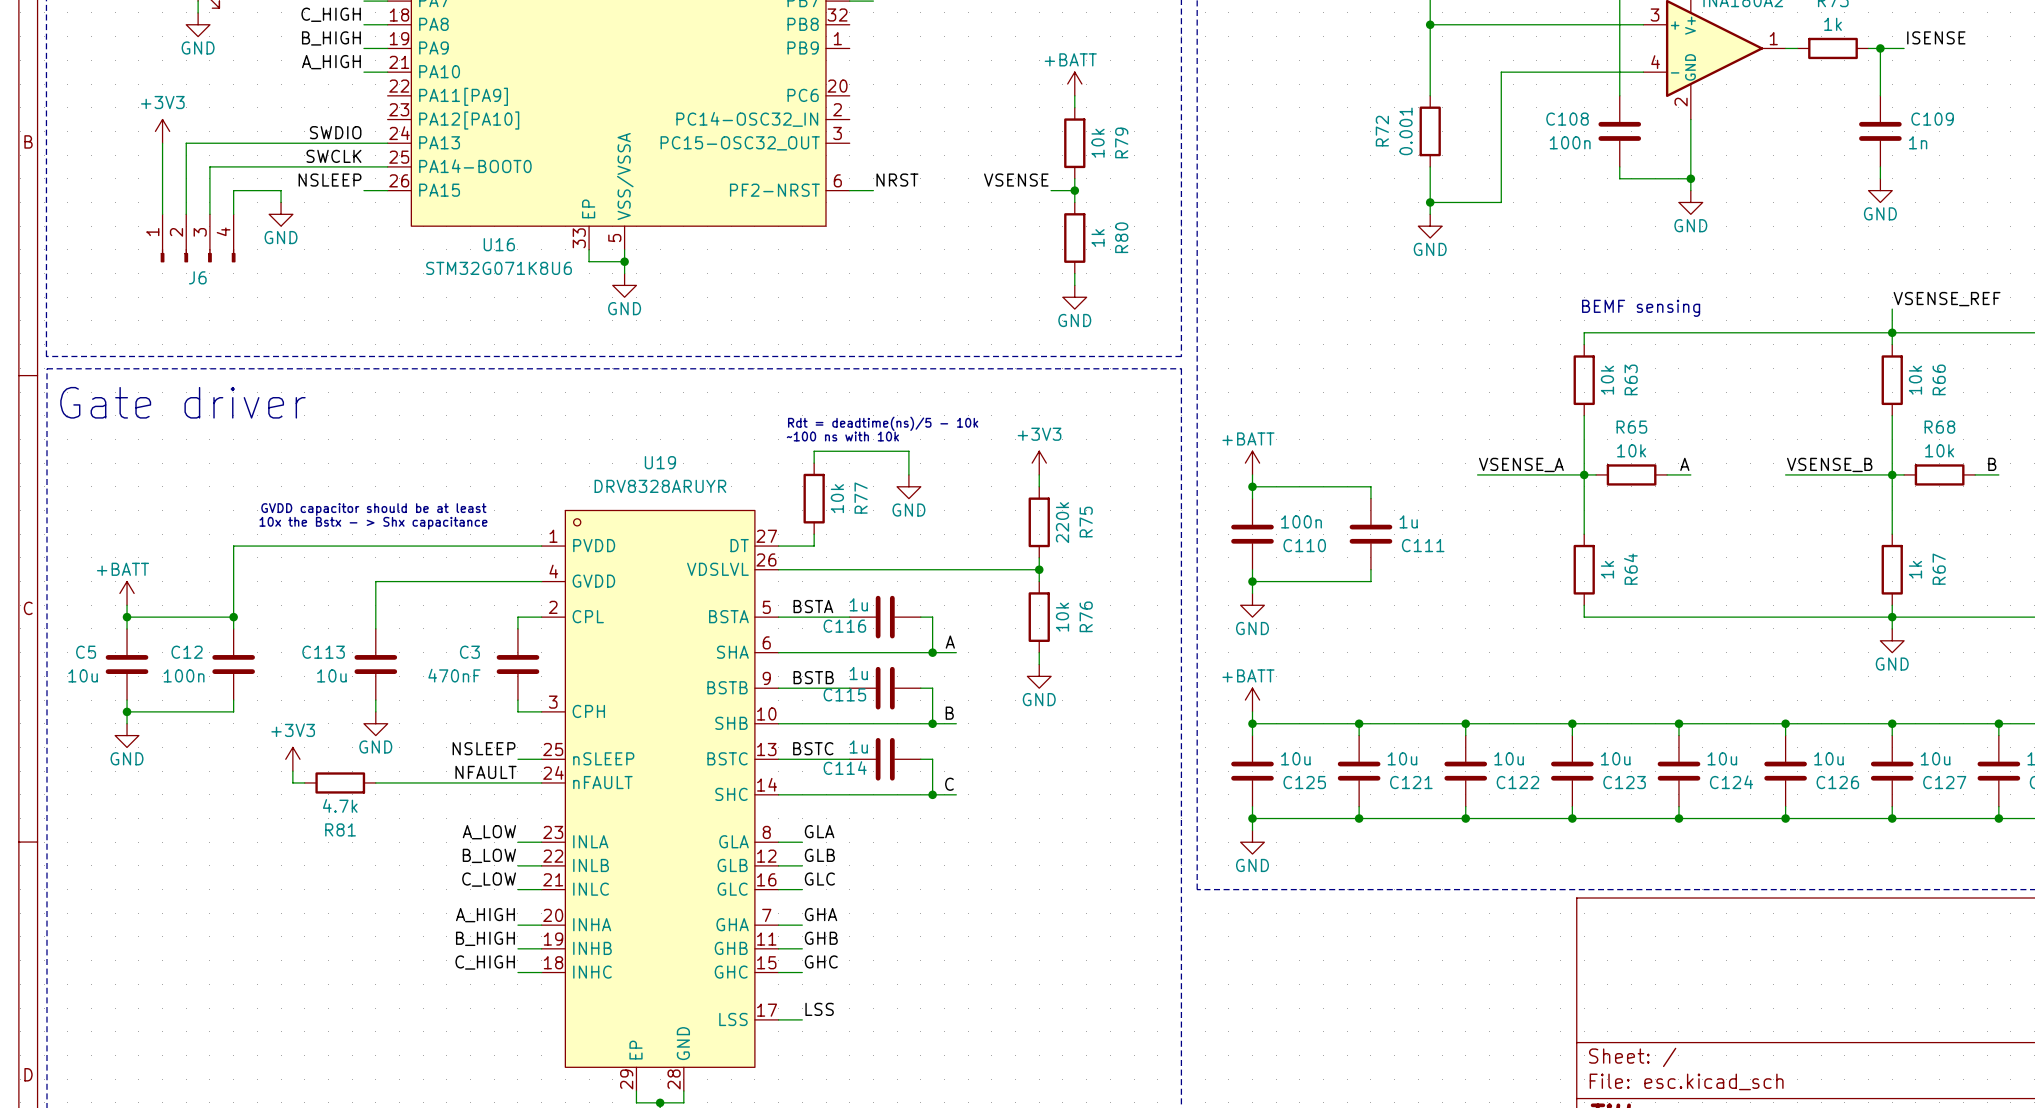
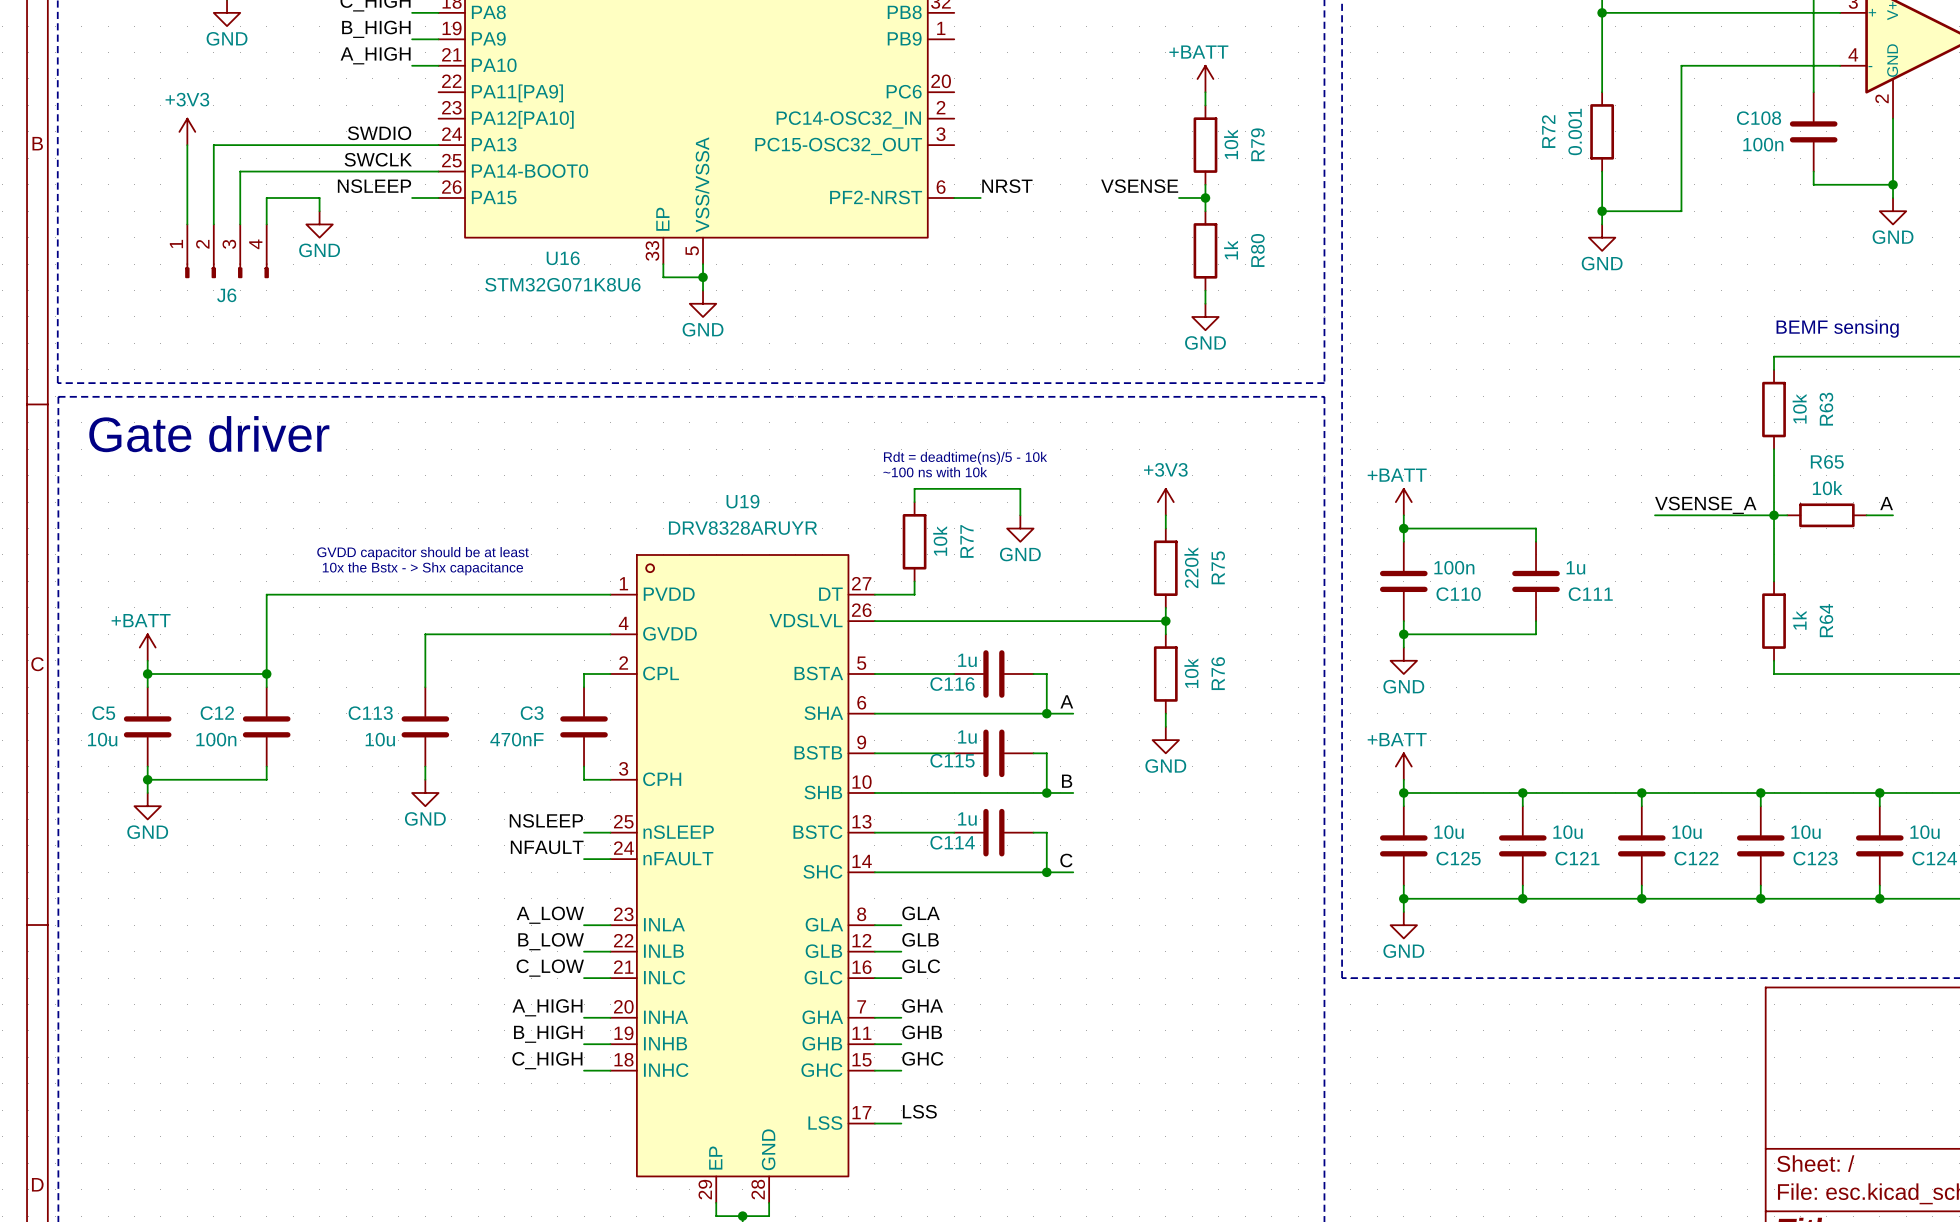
label: BSTA (813, 606) -> none
label: BSTB (813, 677) -> none
label: BSTC (813, 748) -> none
power symbol: +3V3 (292, 759) -> none
wire: (292, 771) (292, 782) (304, 782) -> none
R81: 4.7k (340, 782) -> none
wire: (375, 782) (517, 782) -> none

